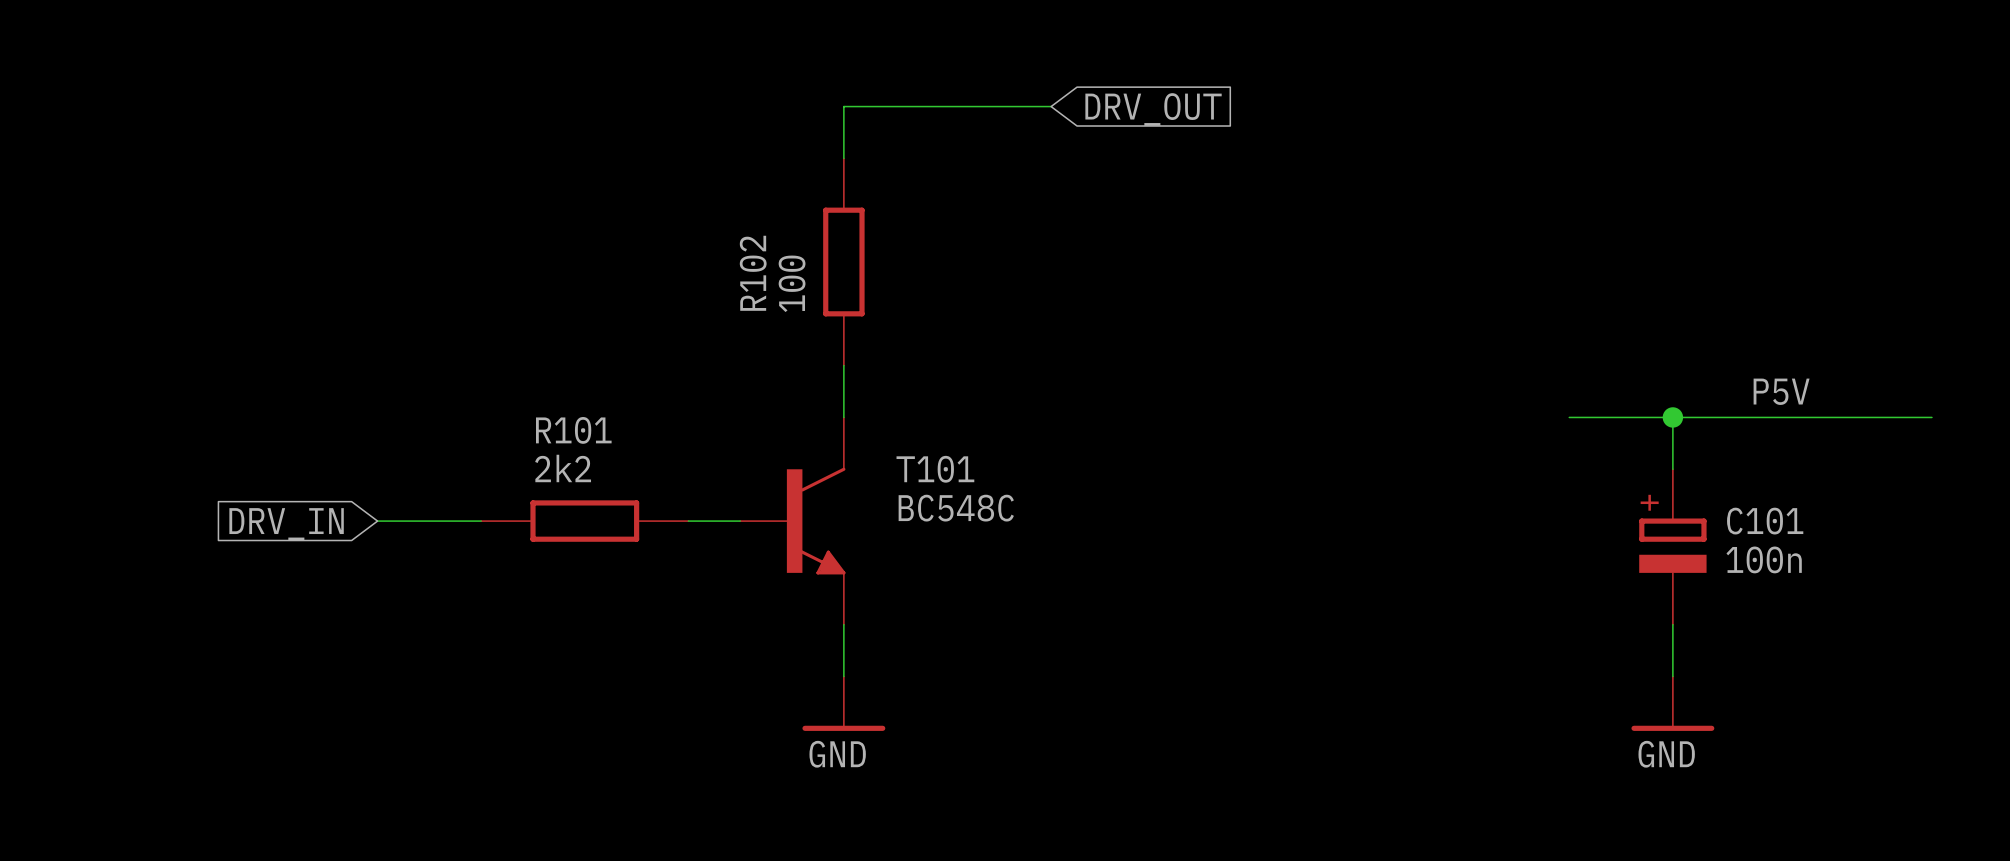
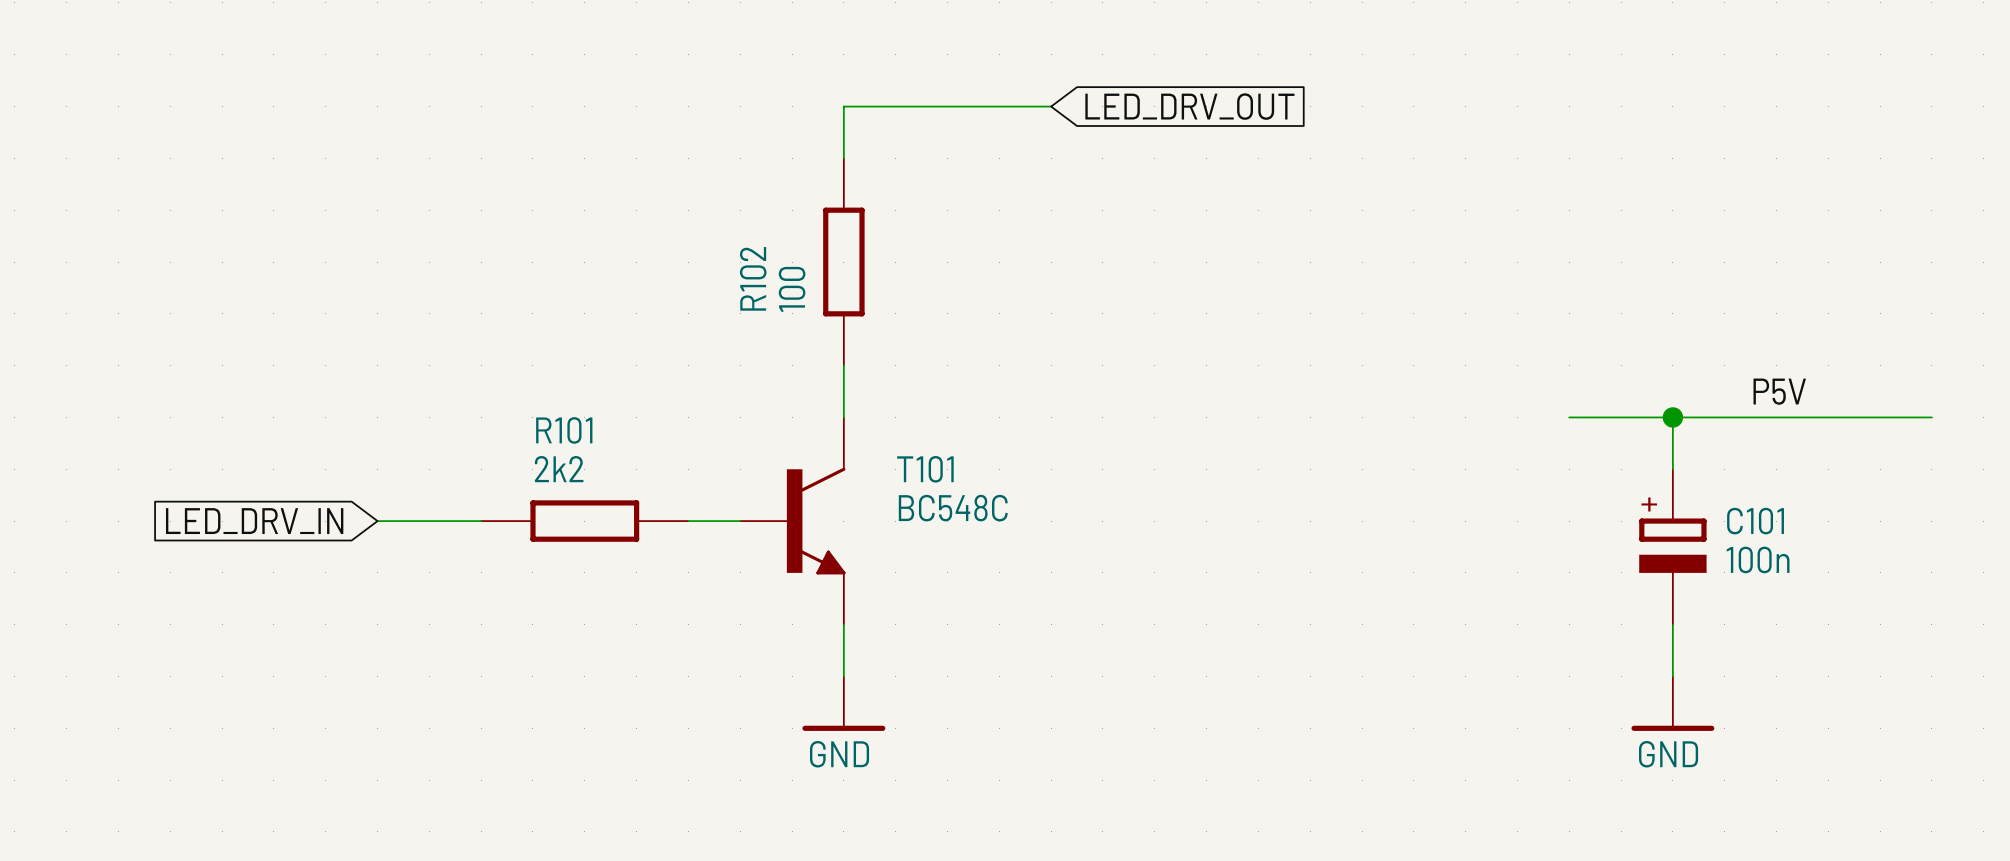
global label: DRV_OUT (1153, 109) -> LED_DRV_OUT (1189, 106)
global label: DRV_IN (286, 524) -> LED_DRV_IN (254, 521)

